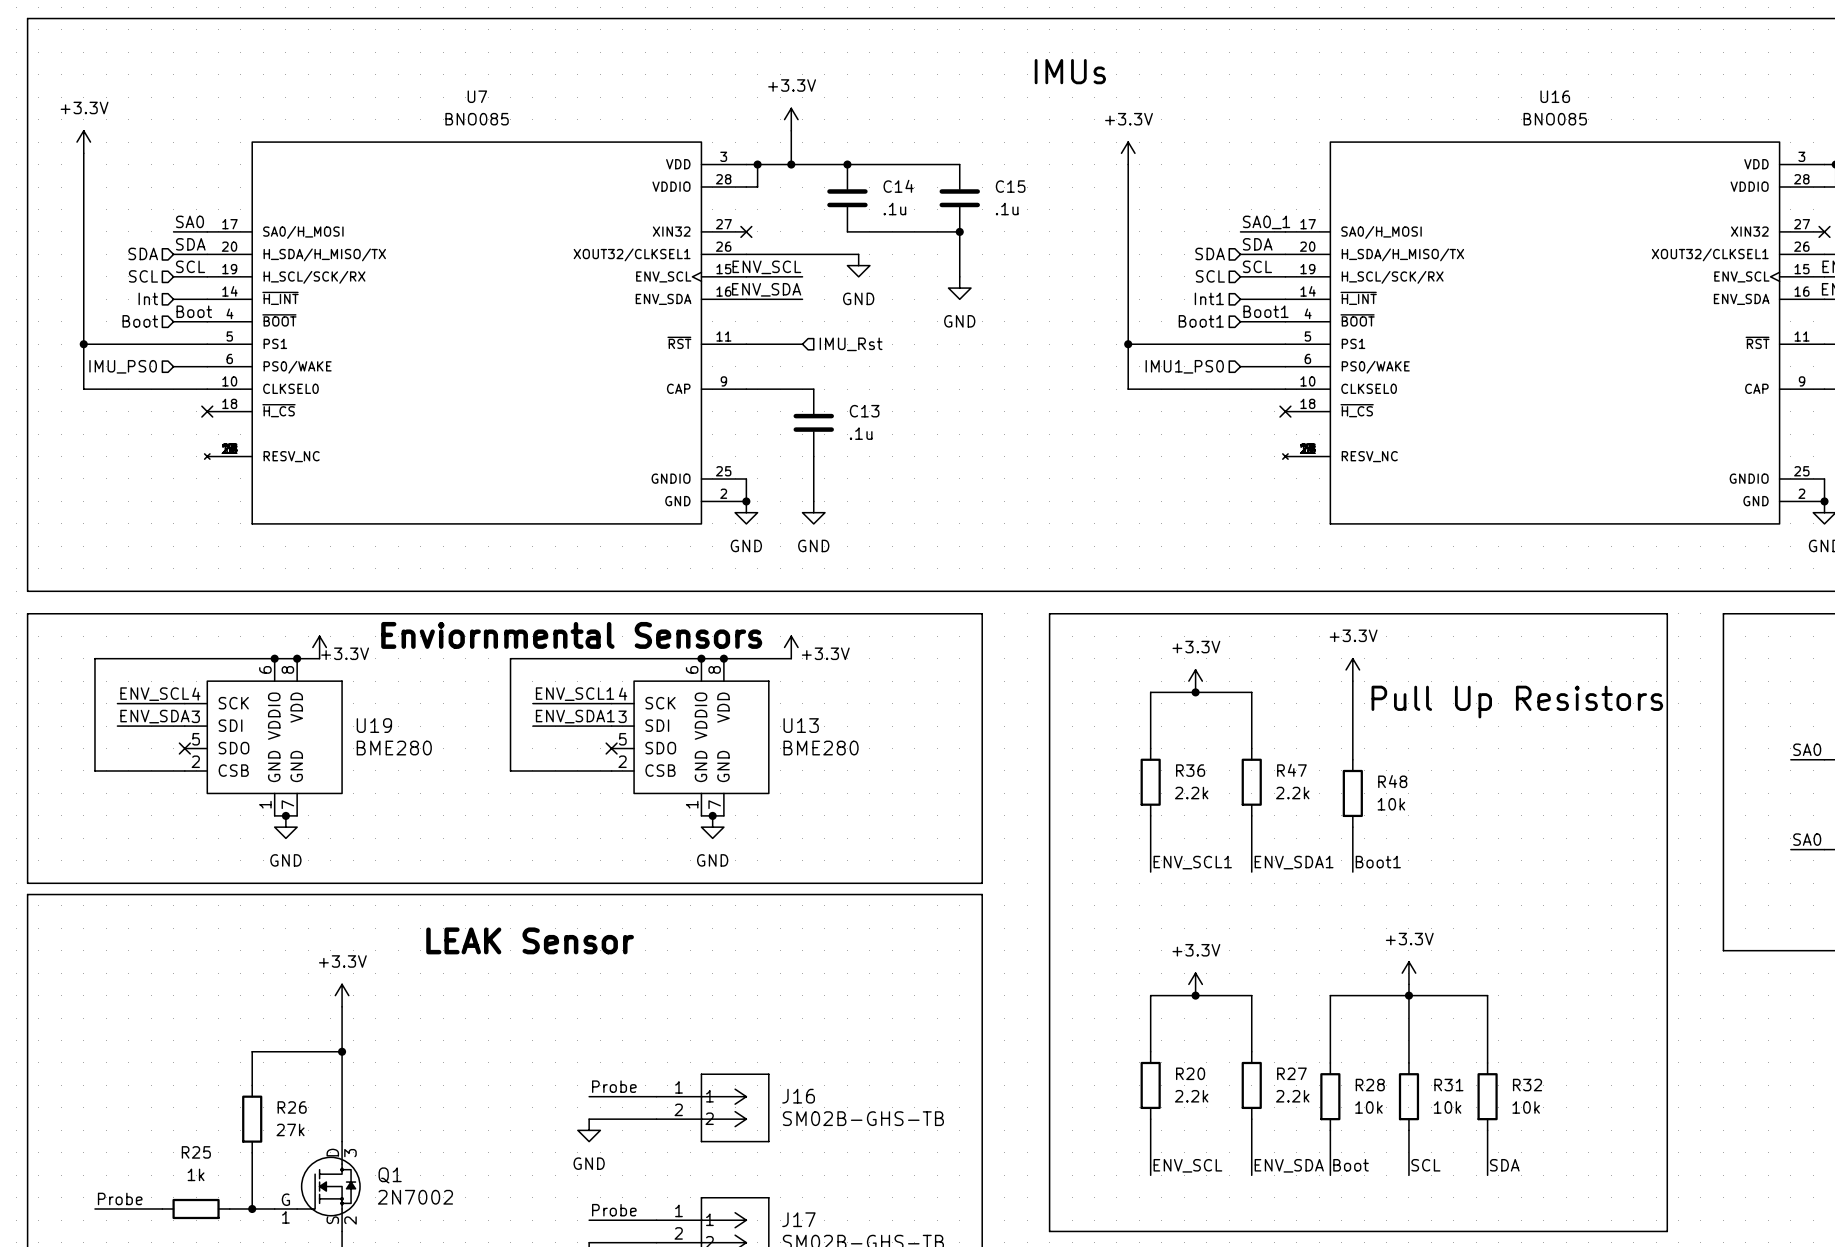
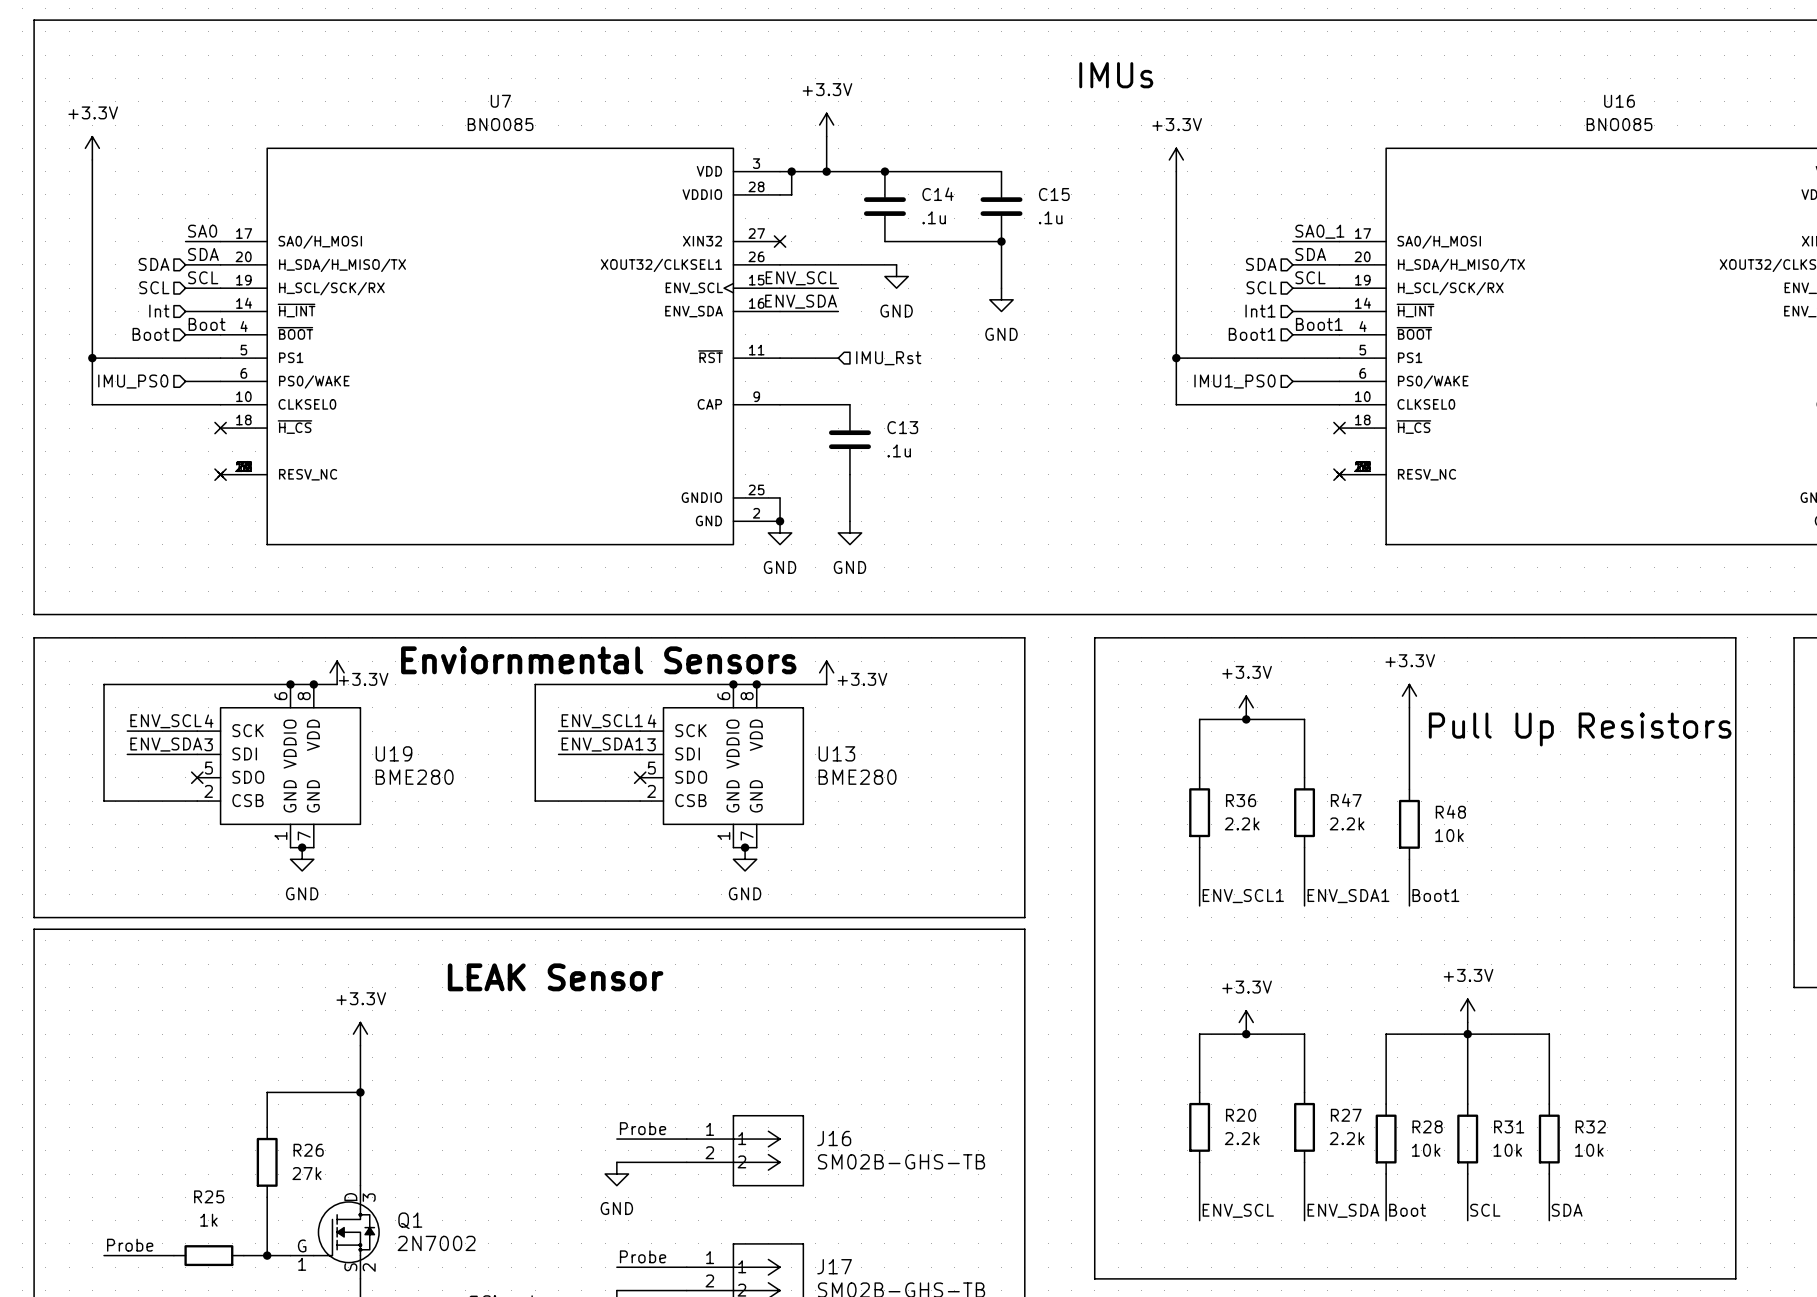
no-connect mark: none -> (220, 474)
no-connect mark: none -> (1339, 474)

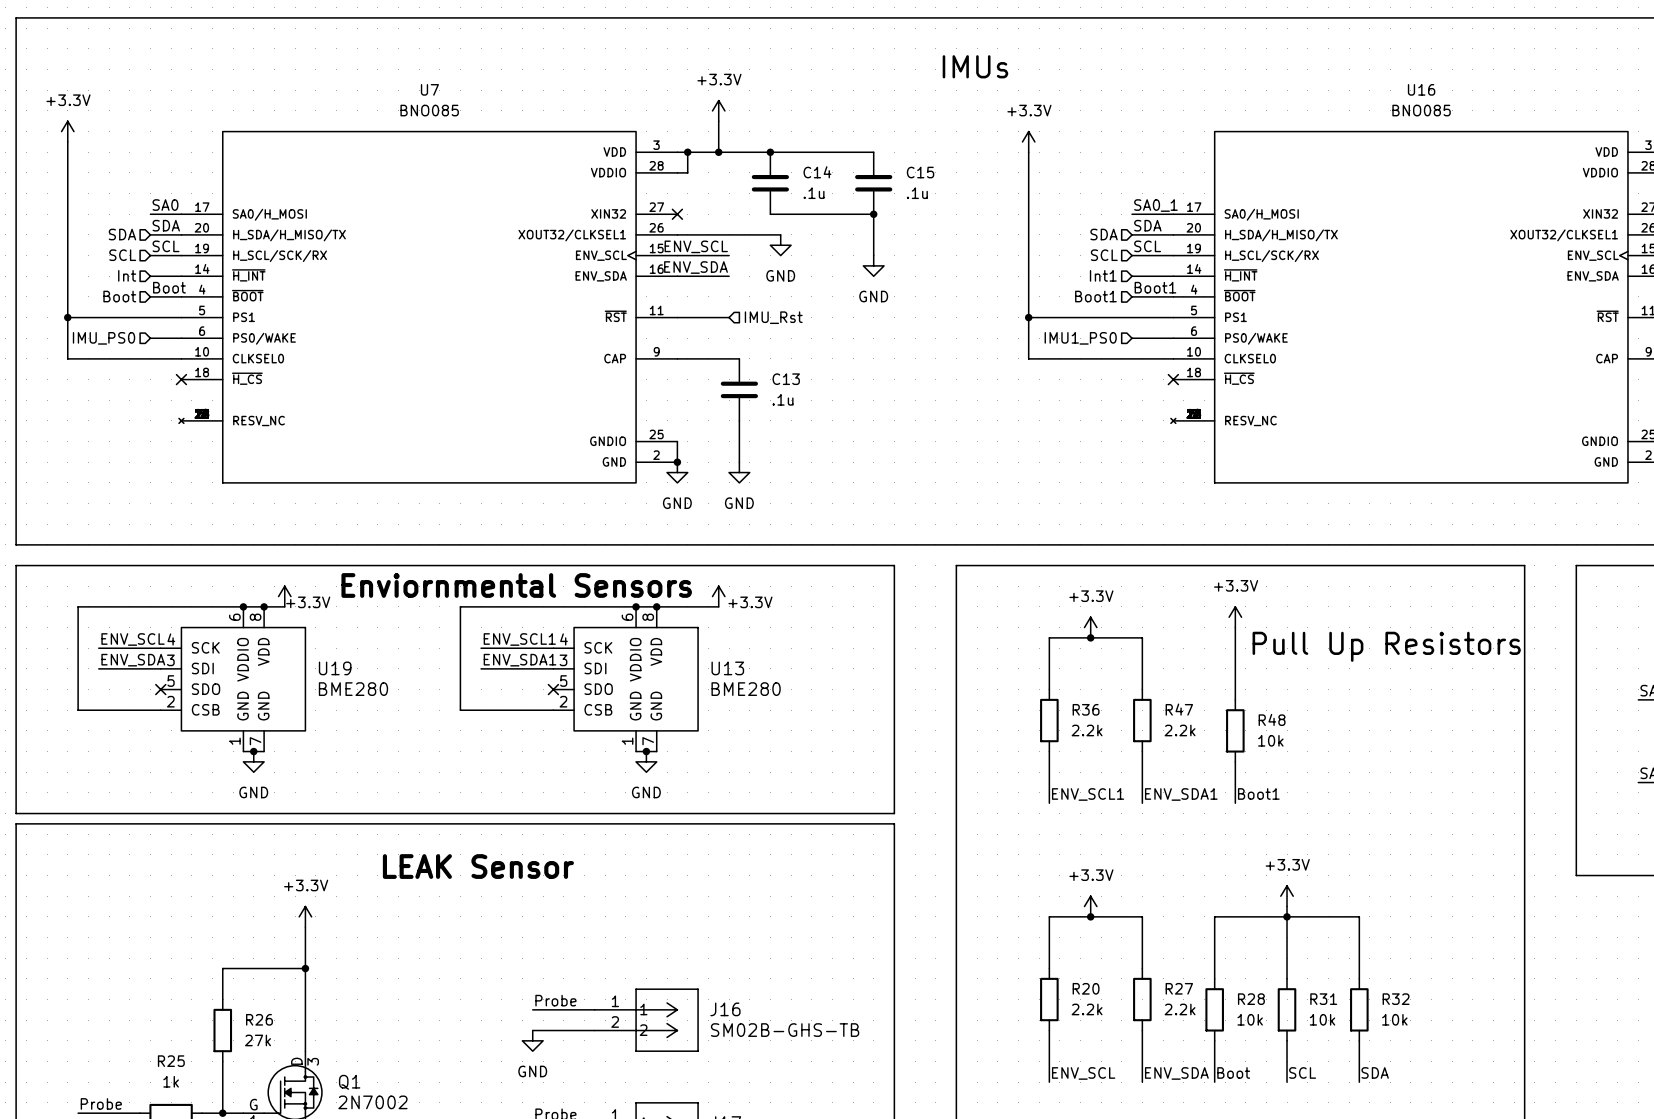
no-connect mark: (220, 474) -> none
no-connect mark: (1339, 474) -> none

